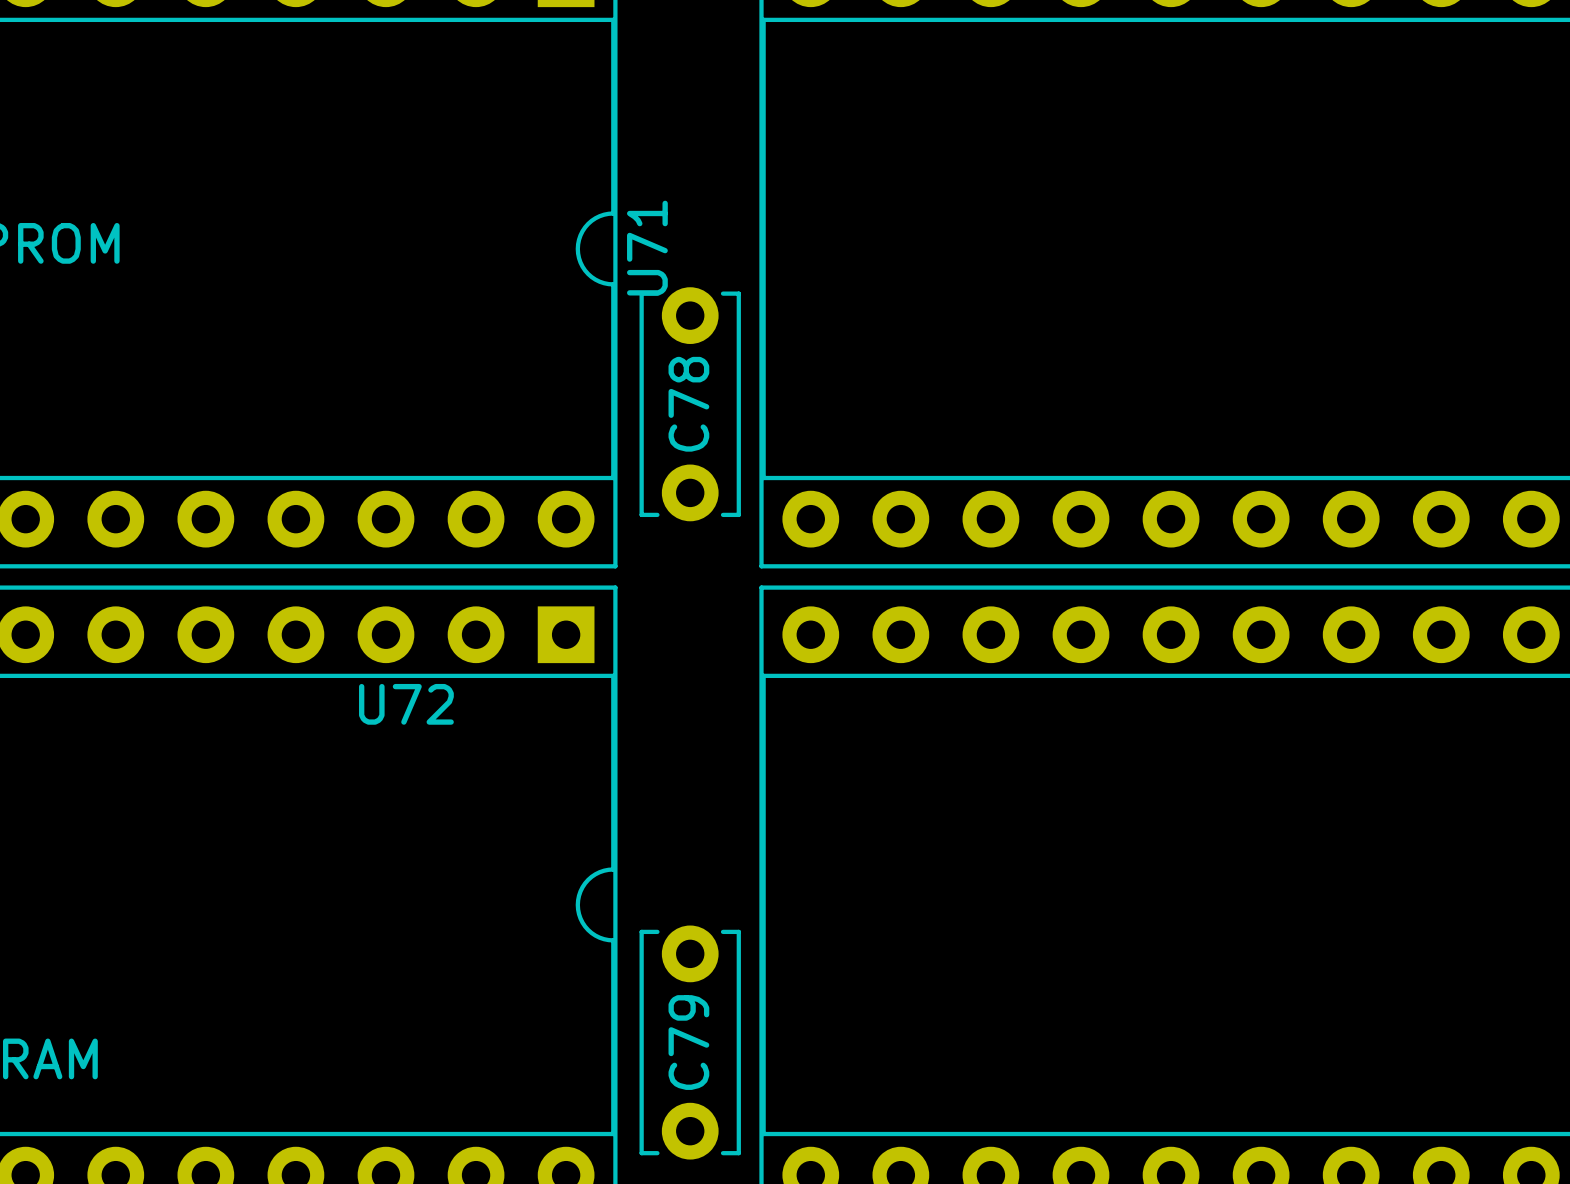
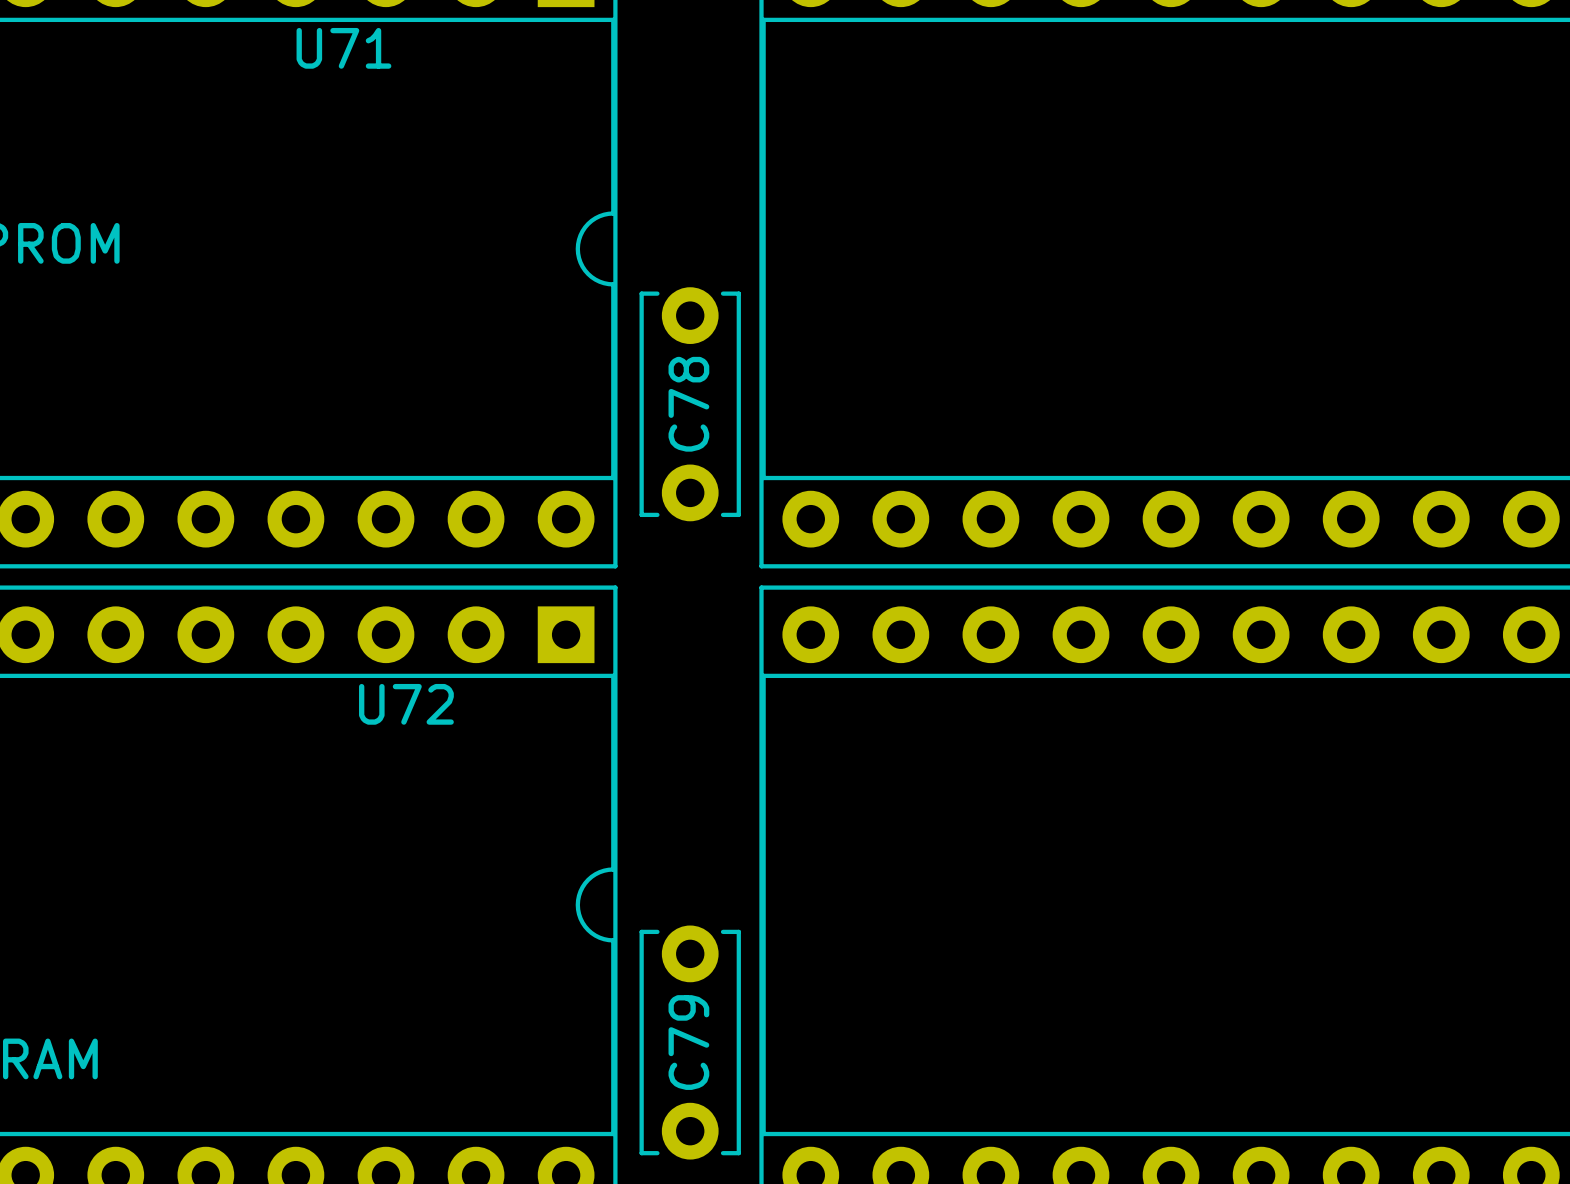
U71 name rotation: 0° (647, 248) -> 90° clockwise (343, 48)
U71 name position: U71 (647, 248) -> U71 (343, 48)

